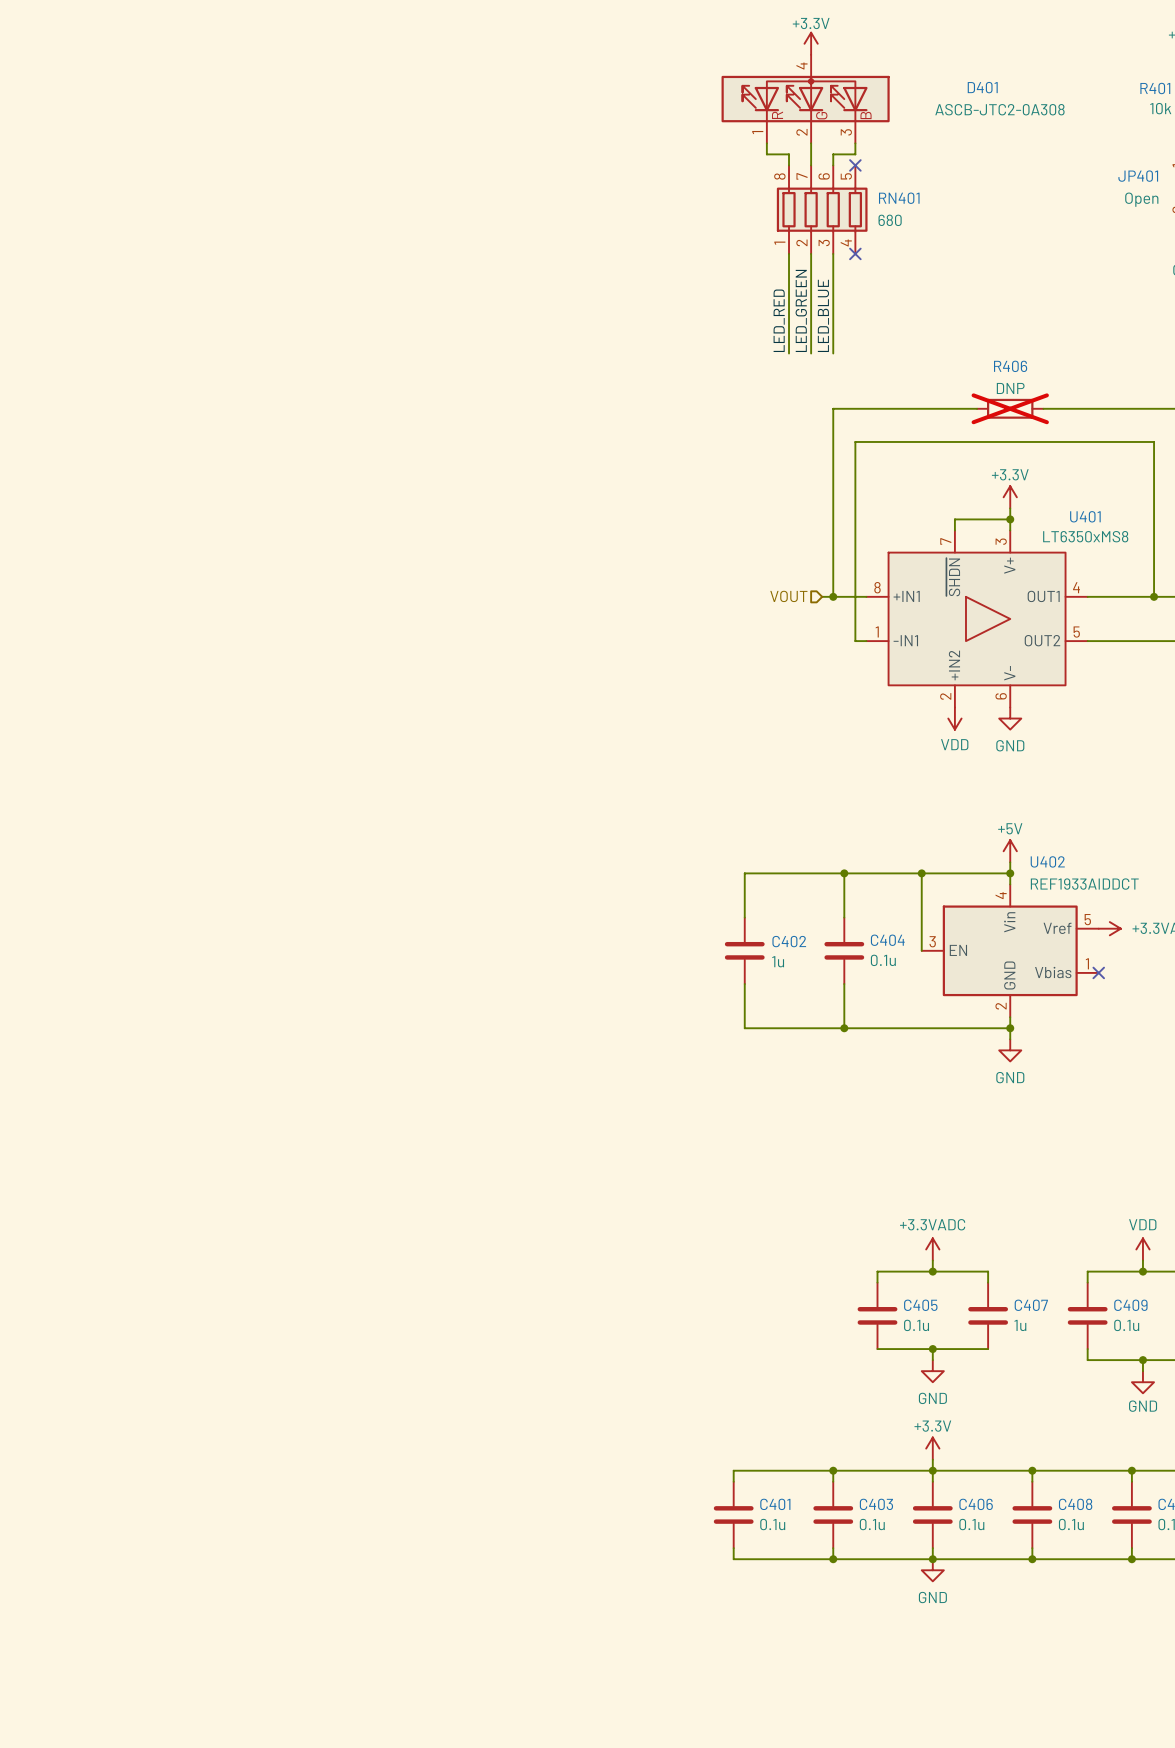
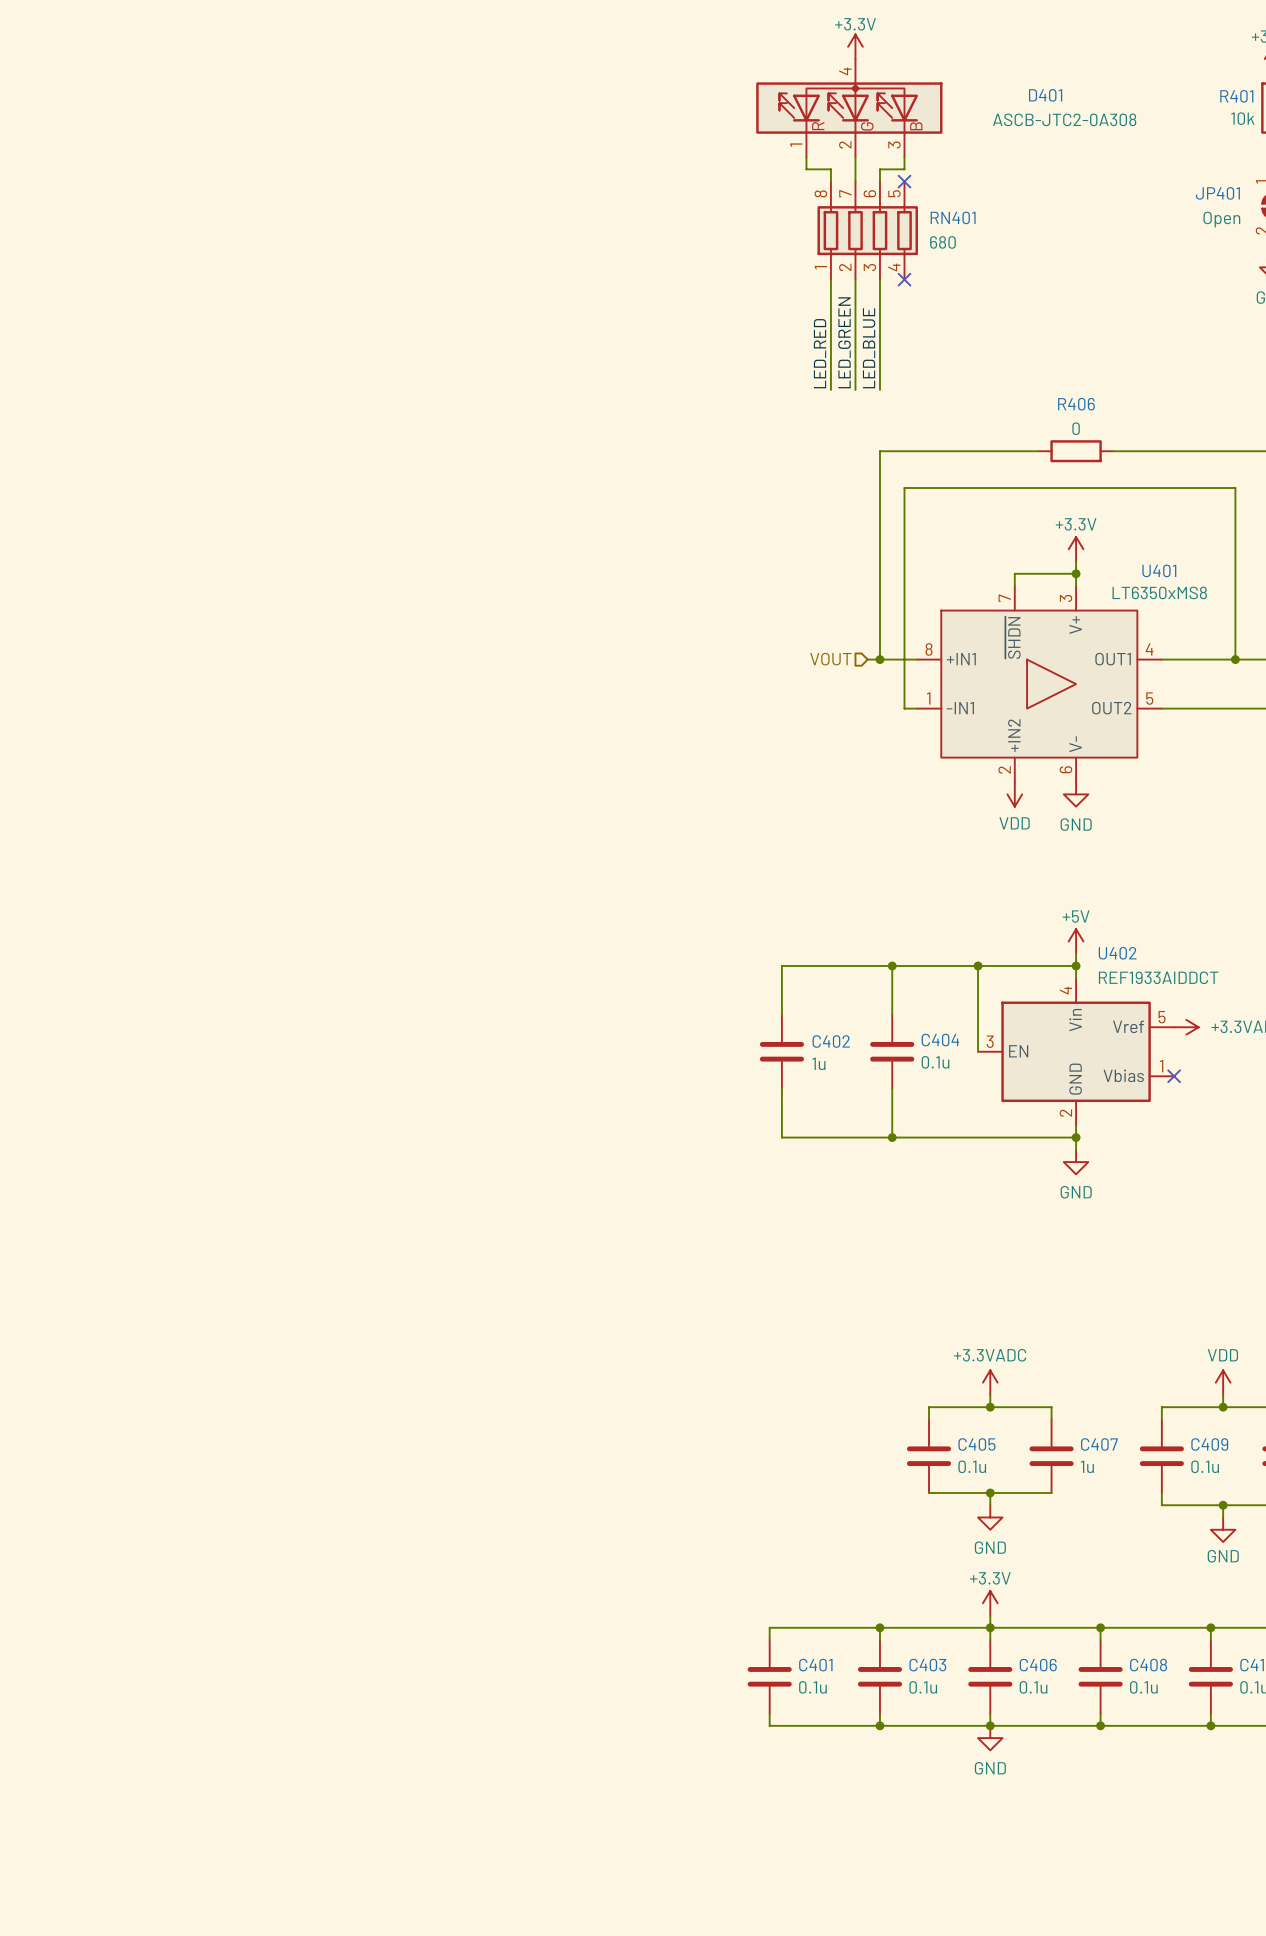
R406 value: DNP (1010, 388) -> 0 (1076, 428)
R406 do-not-place cross: (1010, 408) -> none

